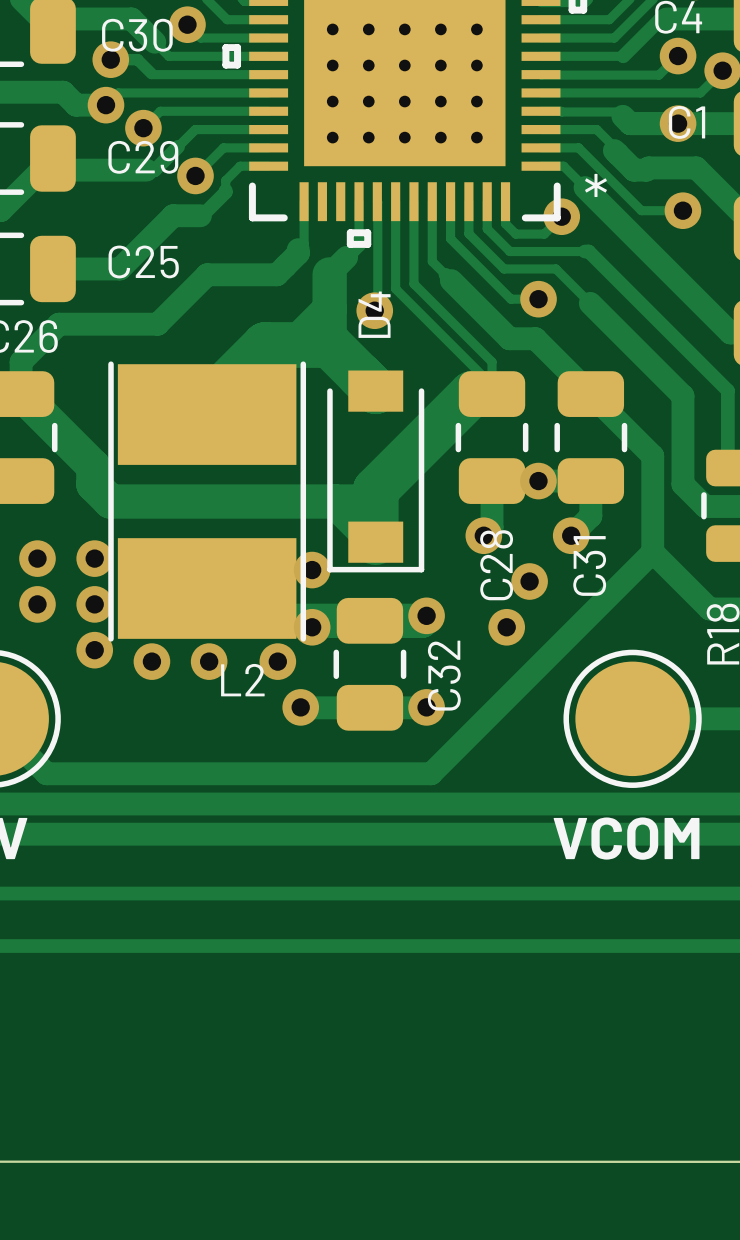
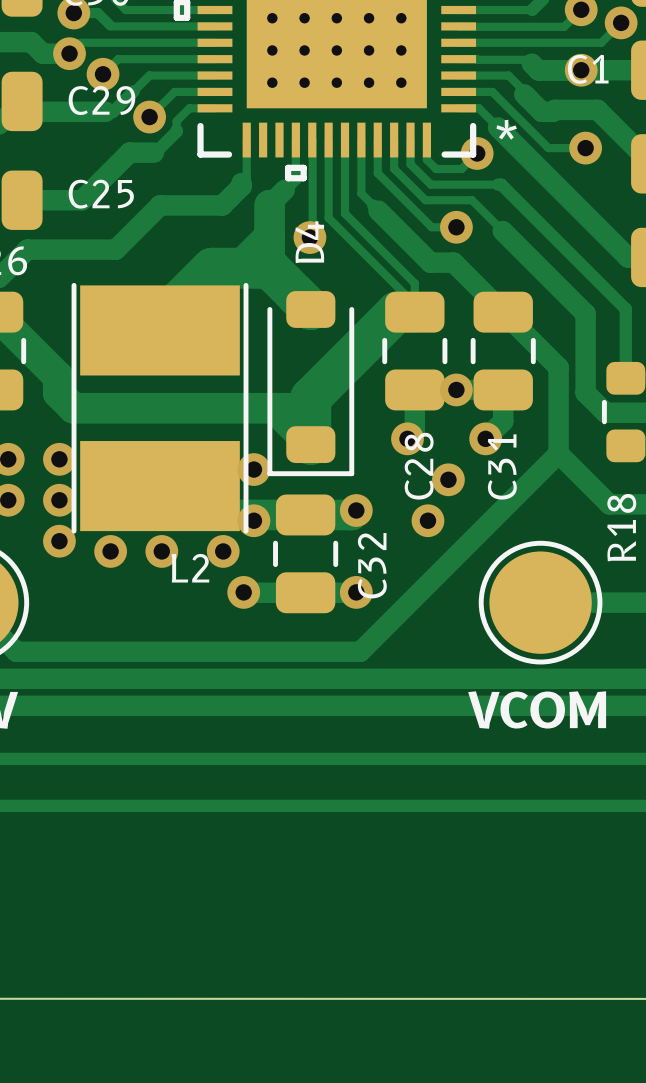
D4 footprint: [327, 370, 425, 573] -> [267, 291, 355, 477]

